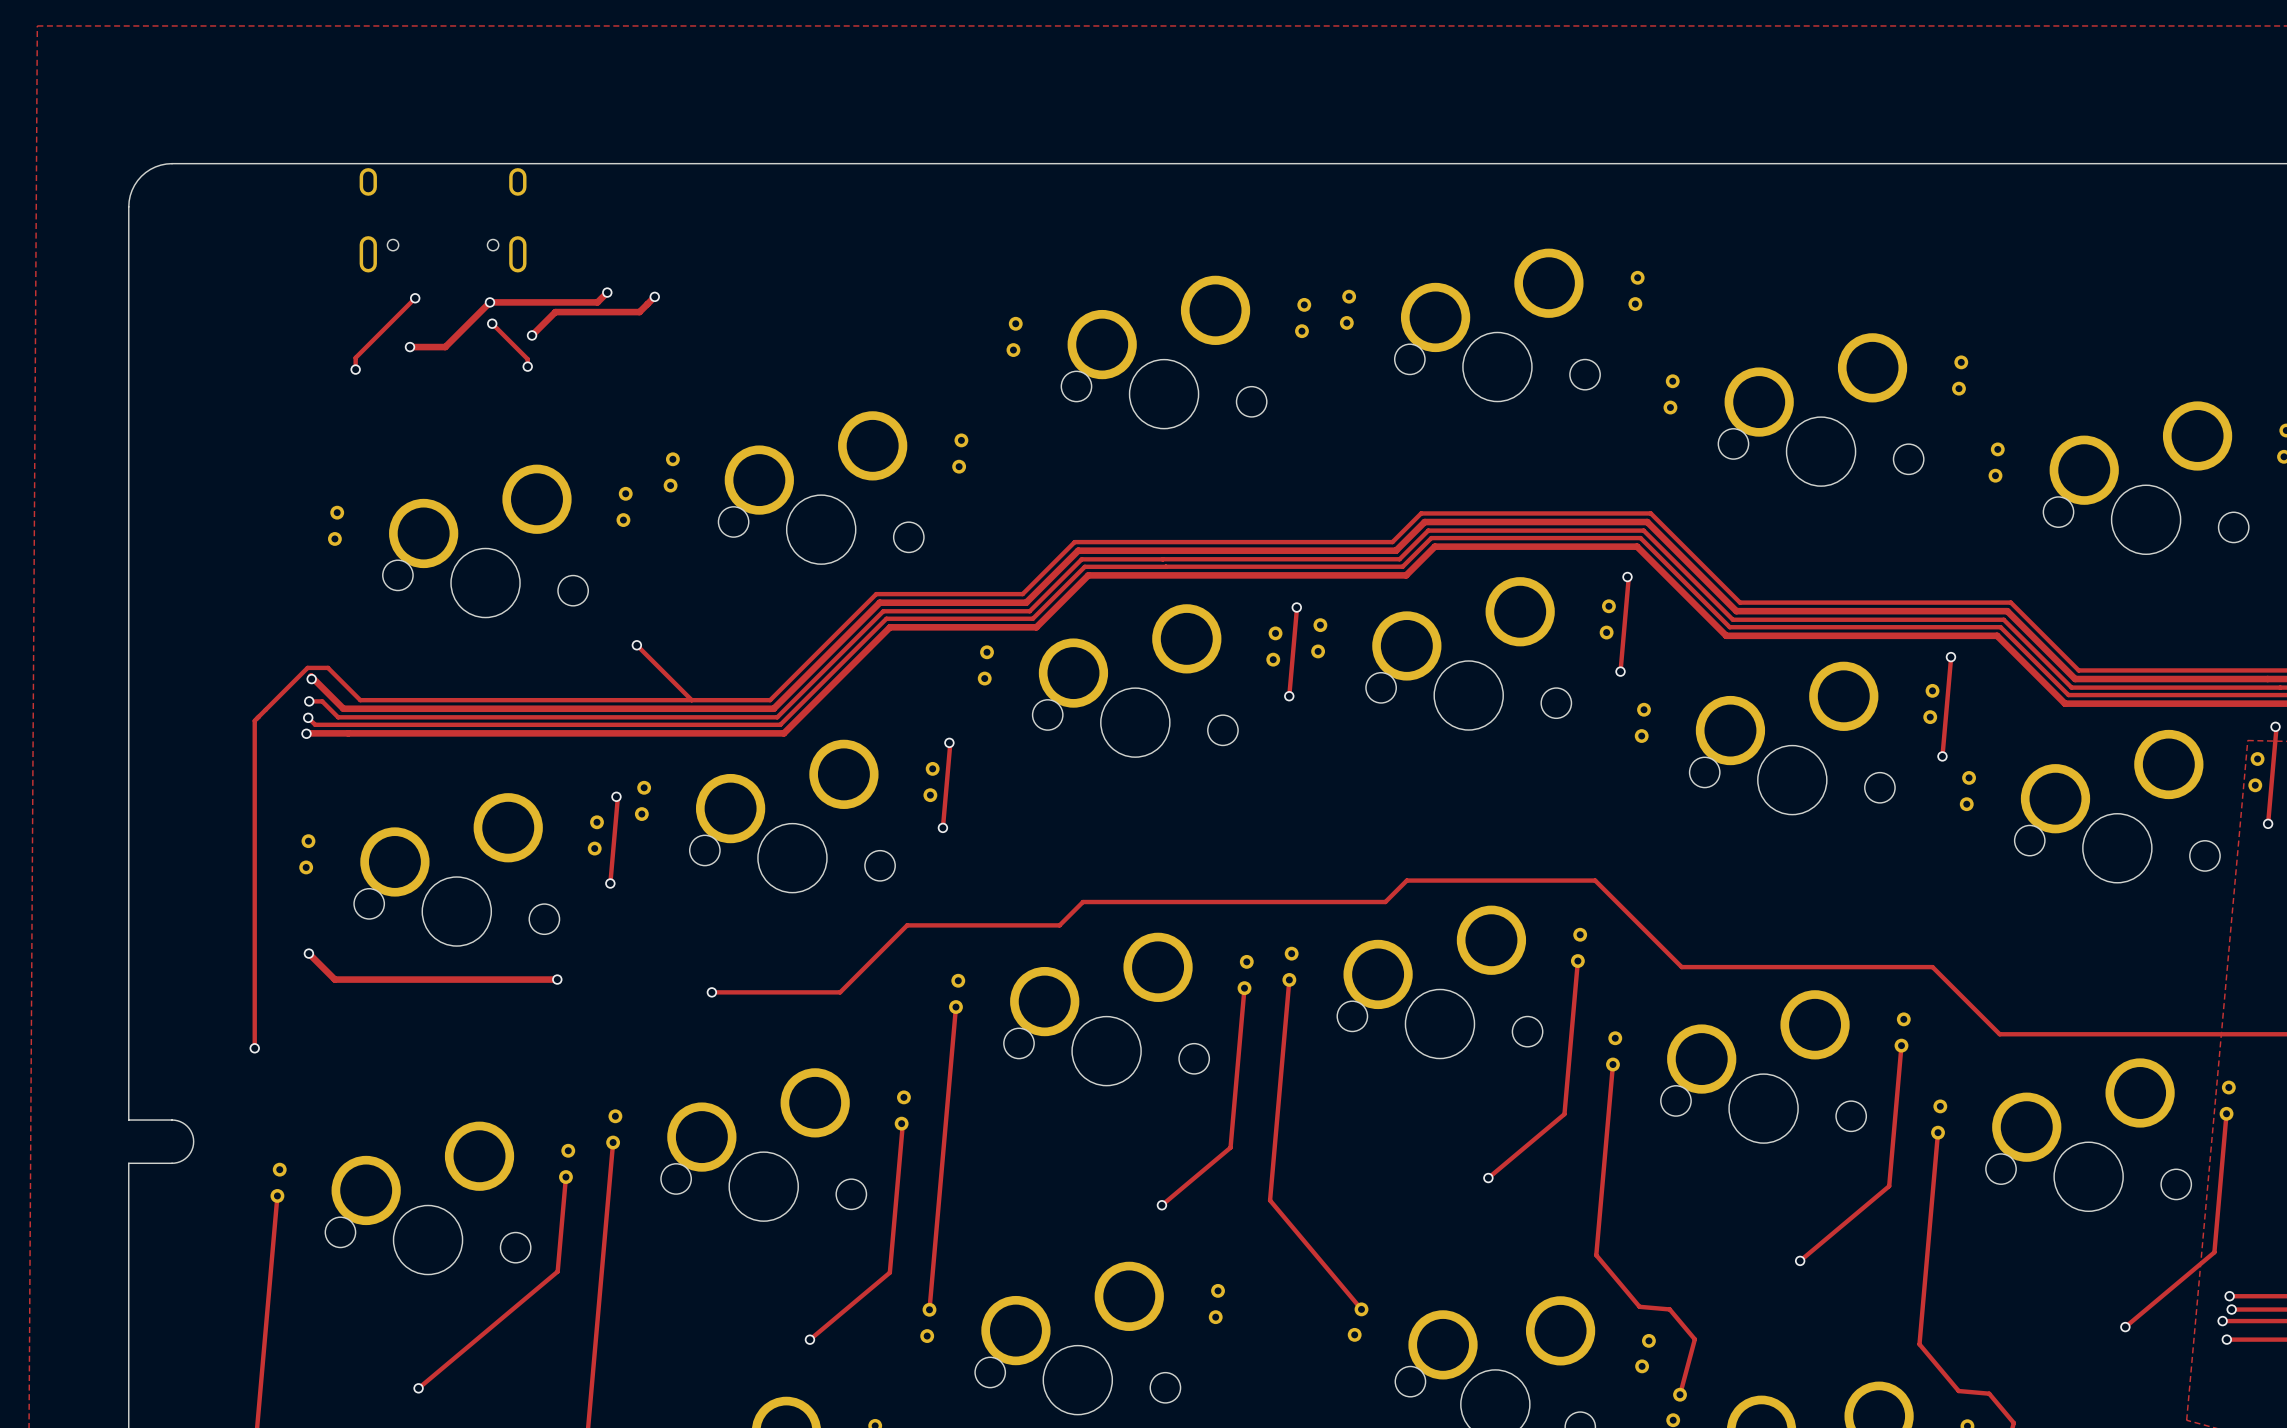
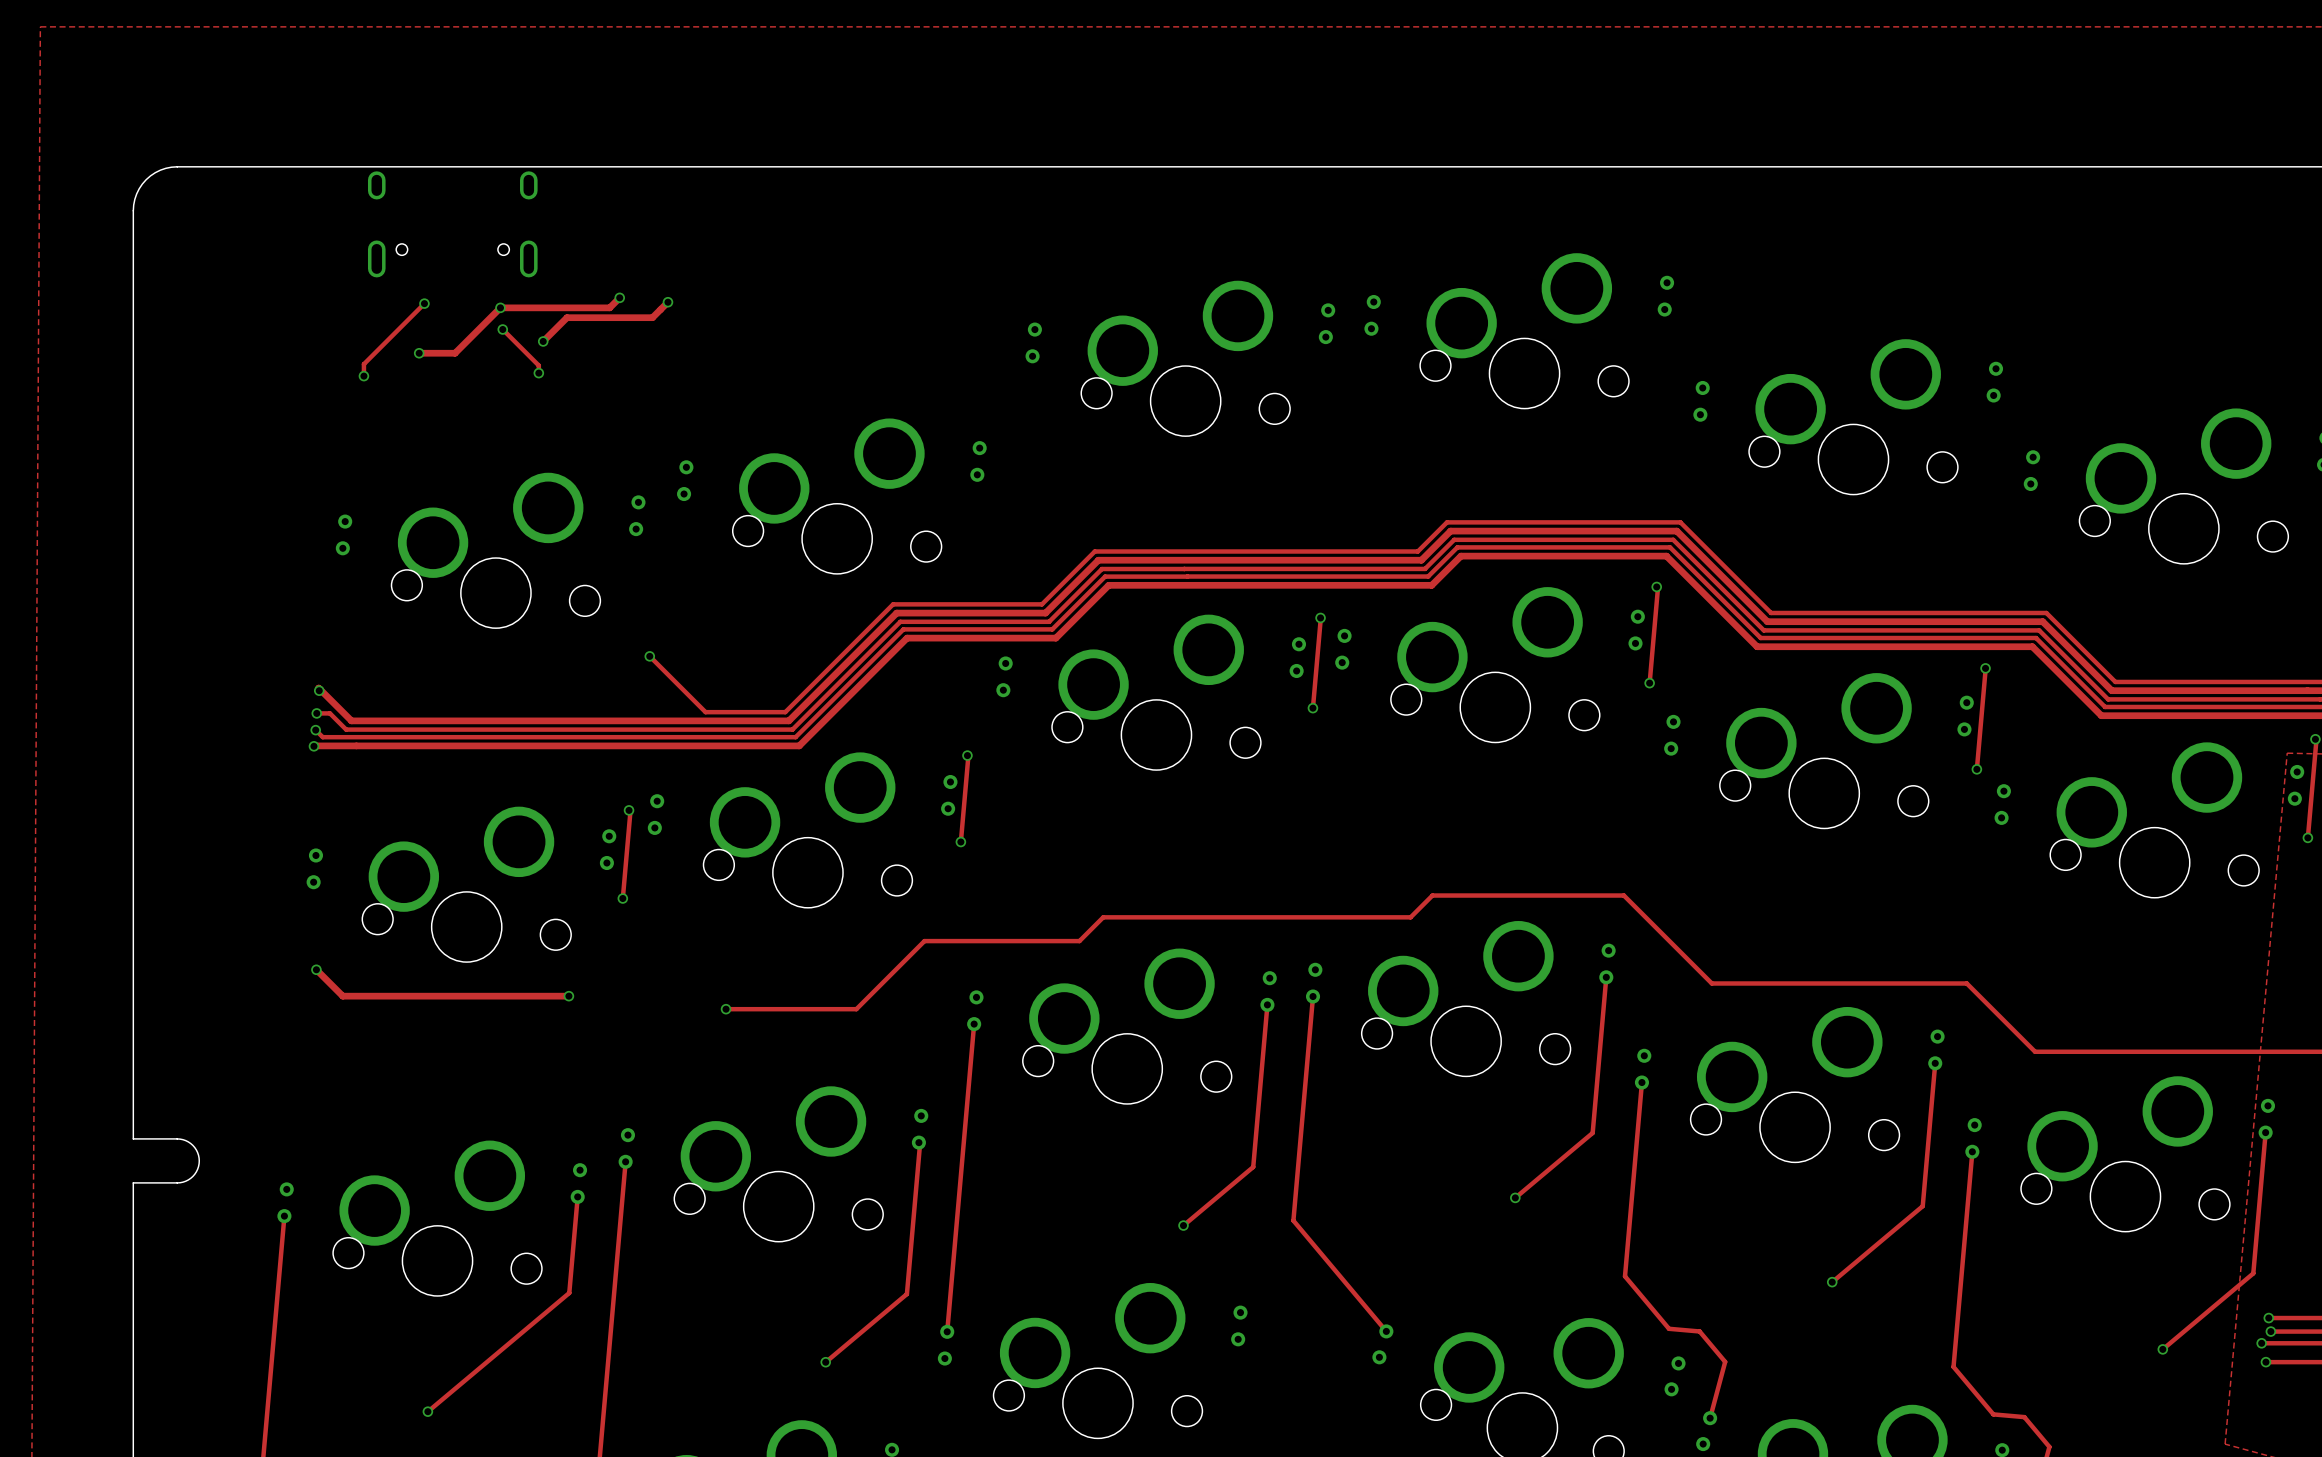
track: (691, 700) (360, 700) (328, 667) (307, 667) (254, 720) (254, 1048) -> none
via: (254, 1048) -> none

